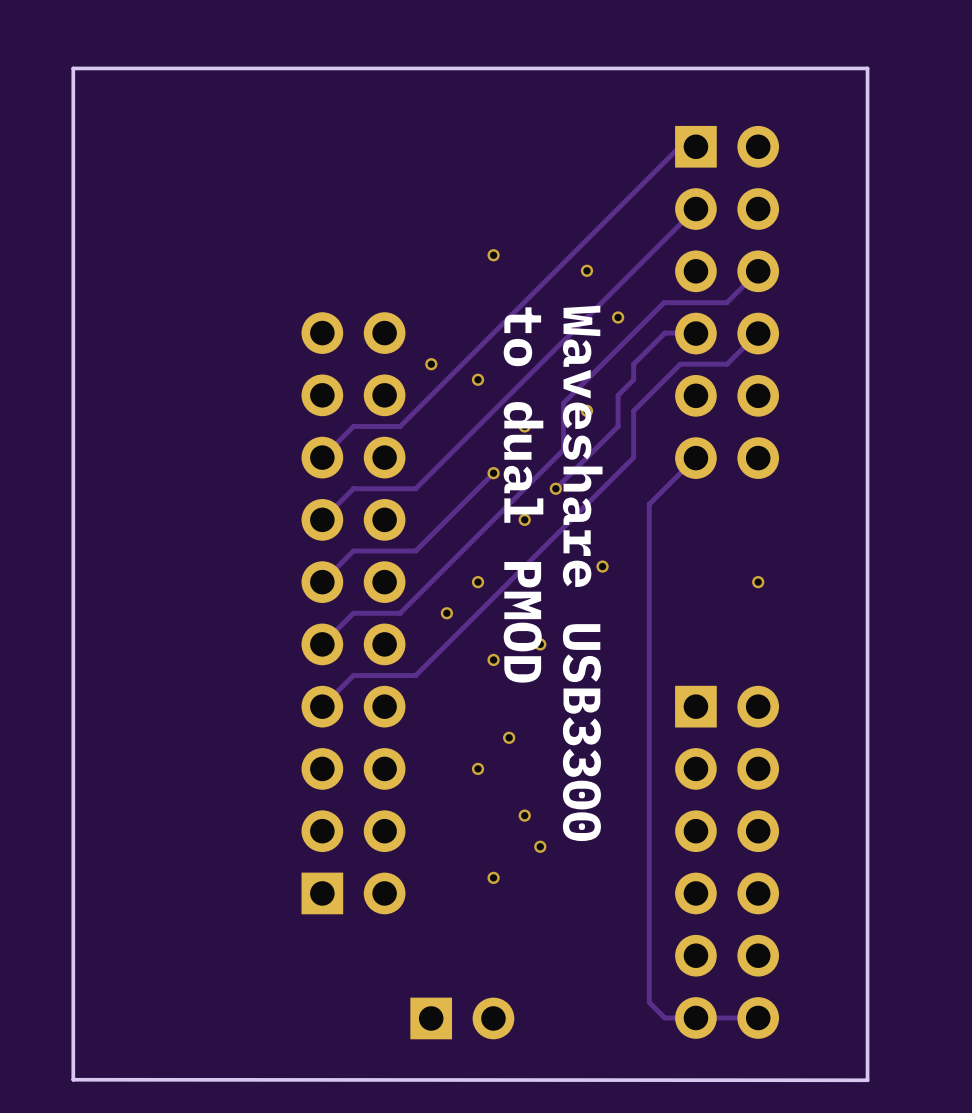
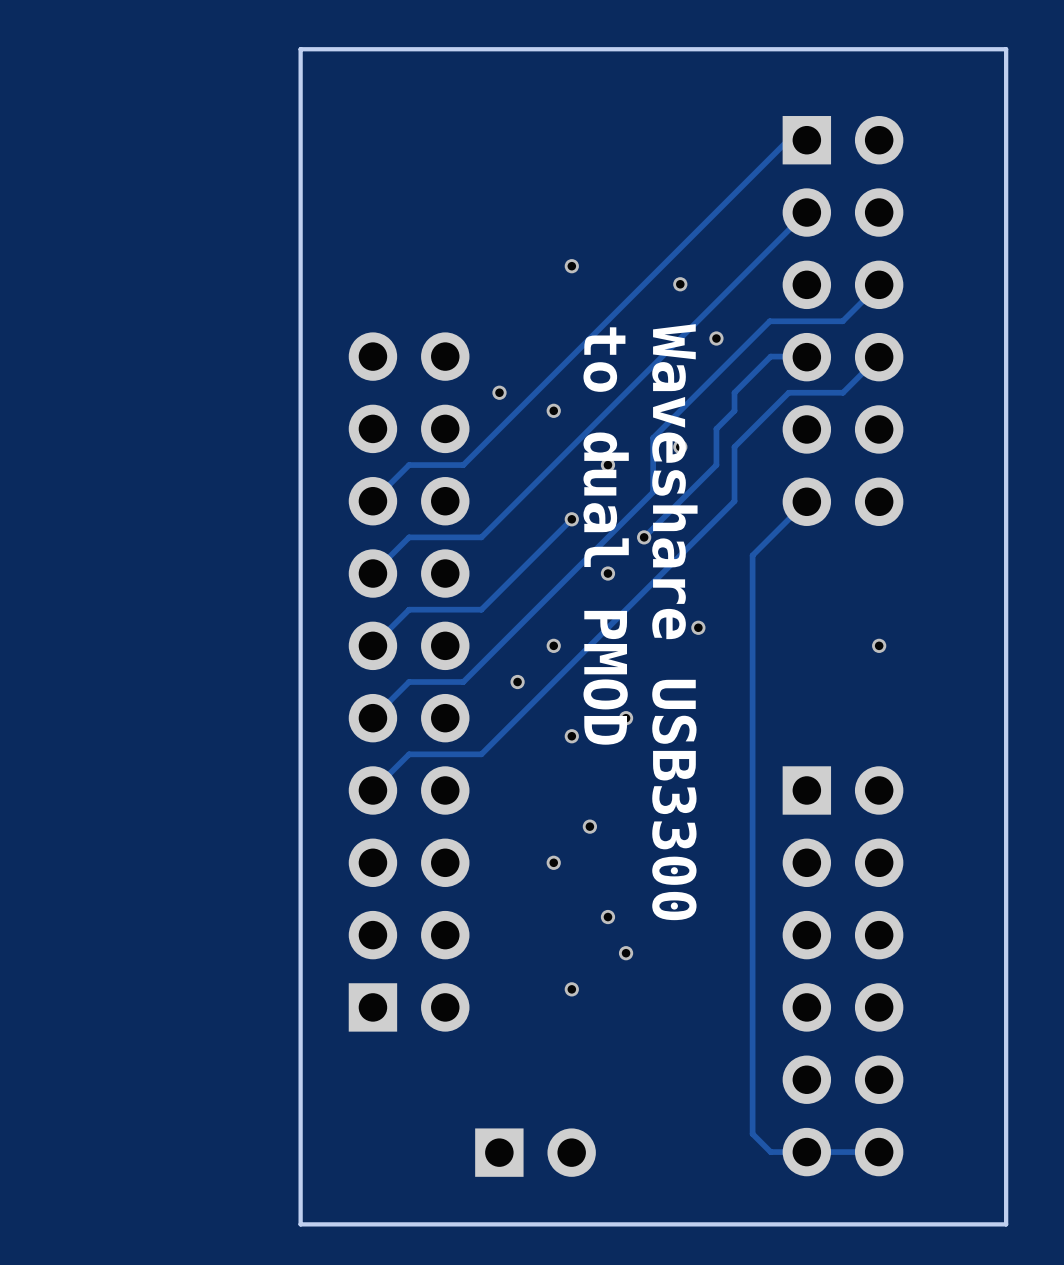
board edge: (260, 68) (73, 68) (73, 1079) (867, 1080) -> (300, 49) (300, 1224) (1006, 1224)

